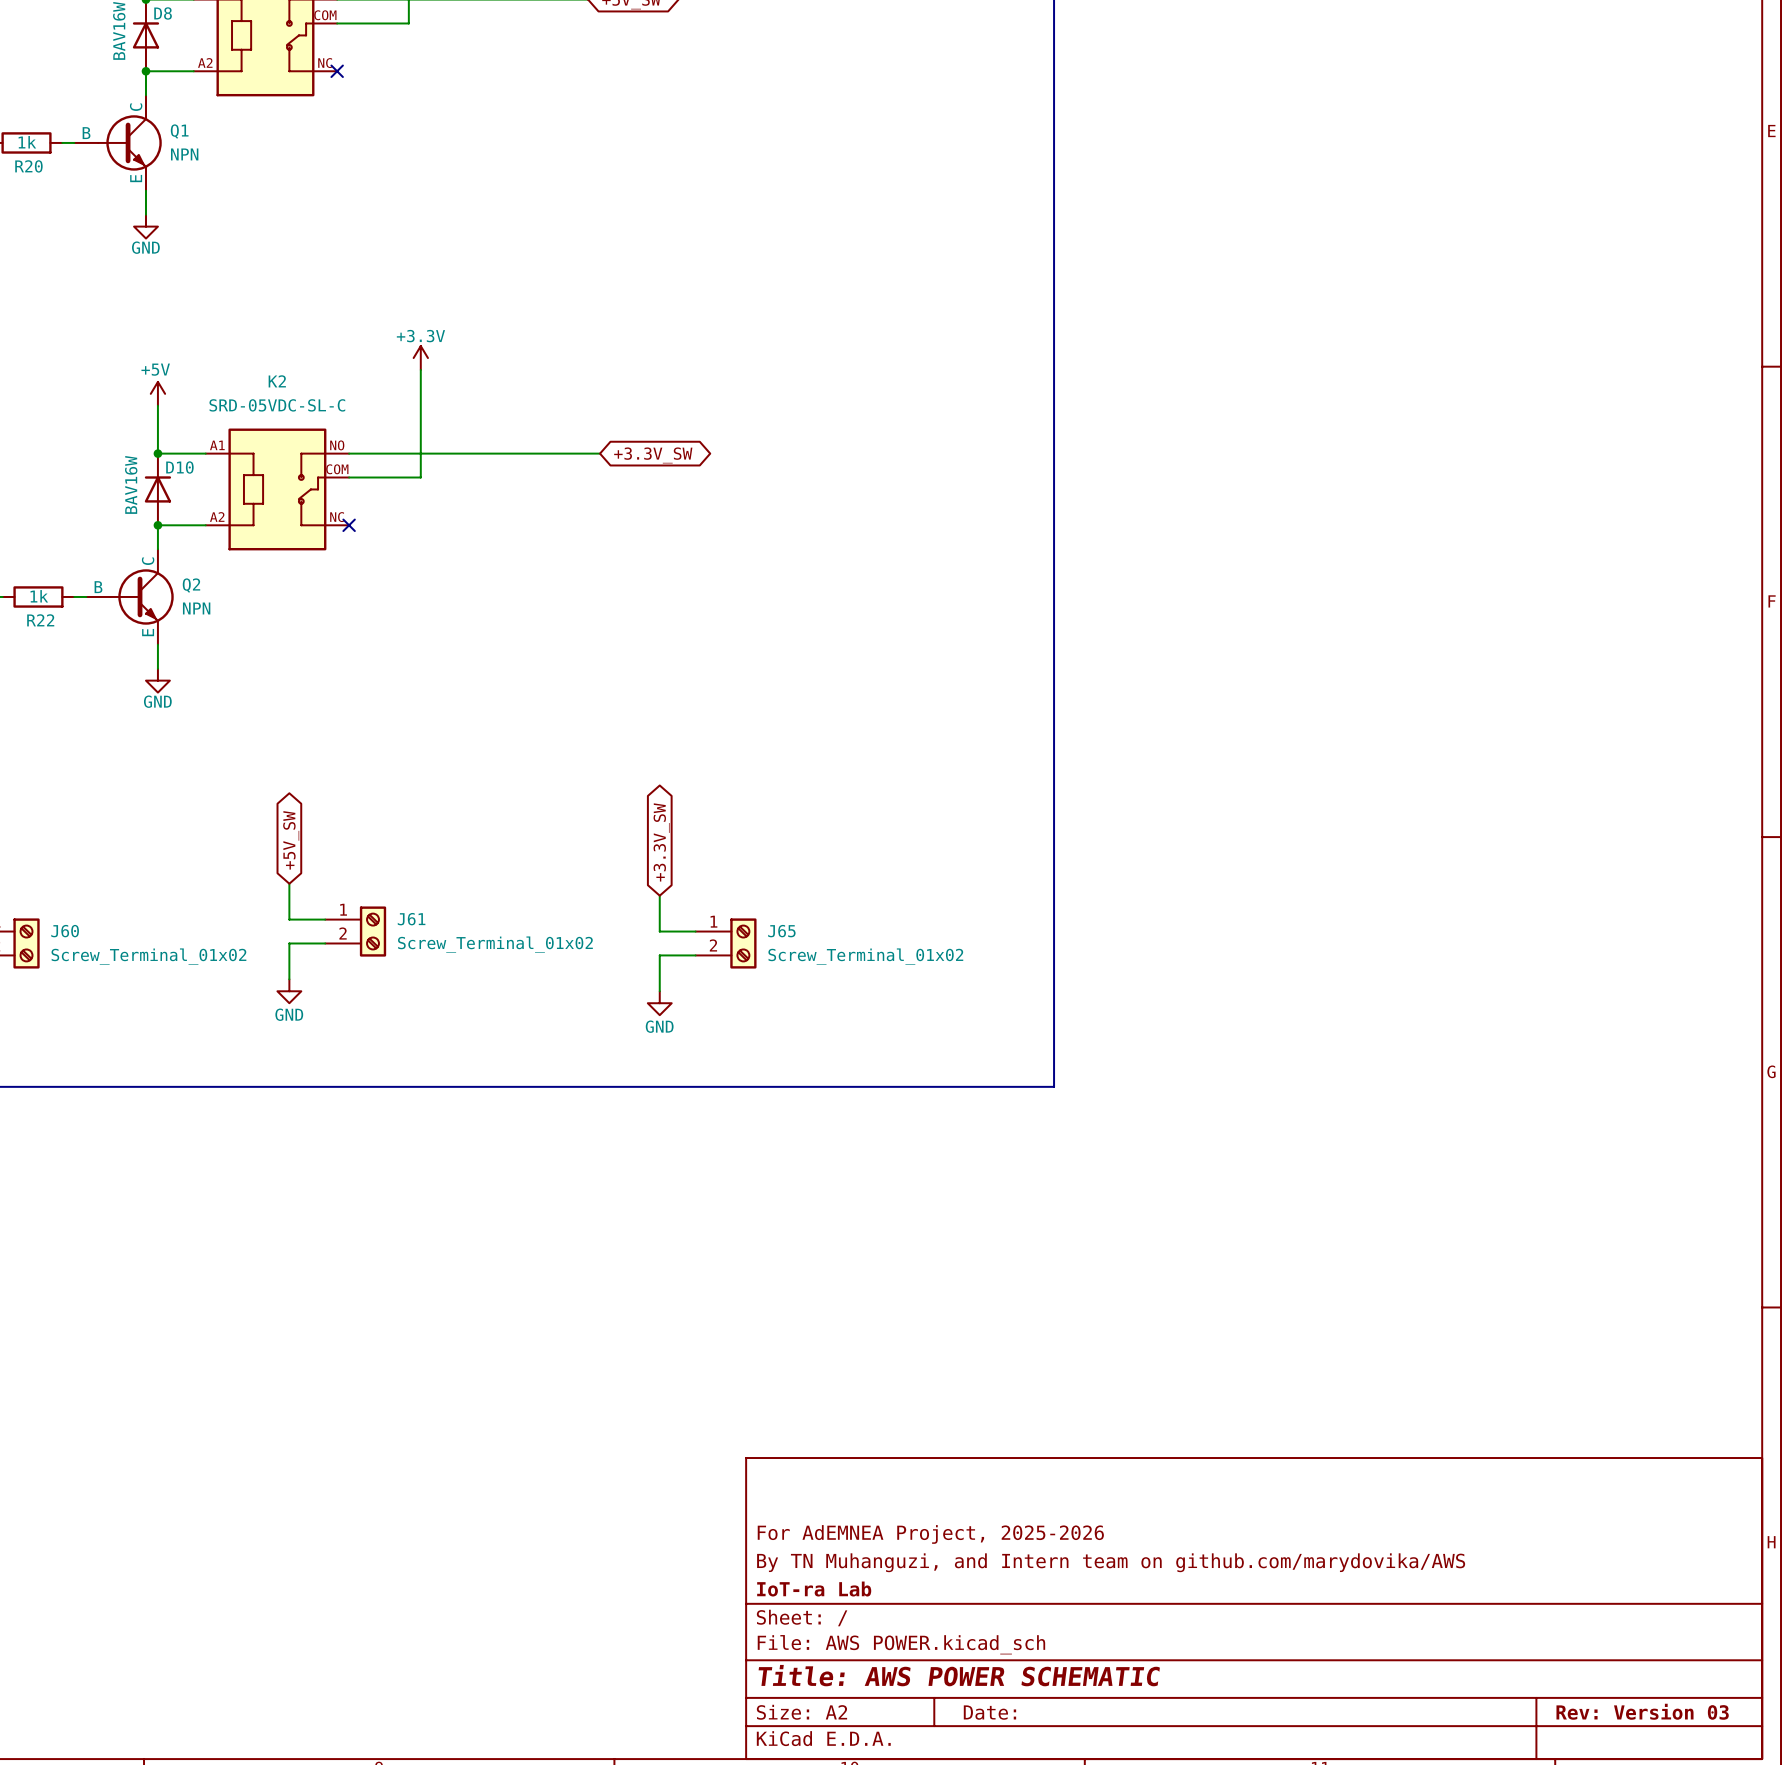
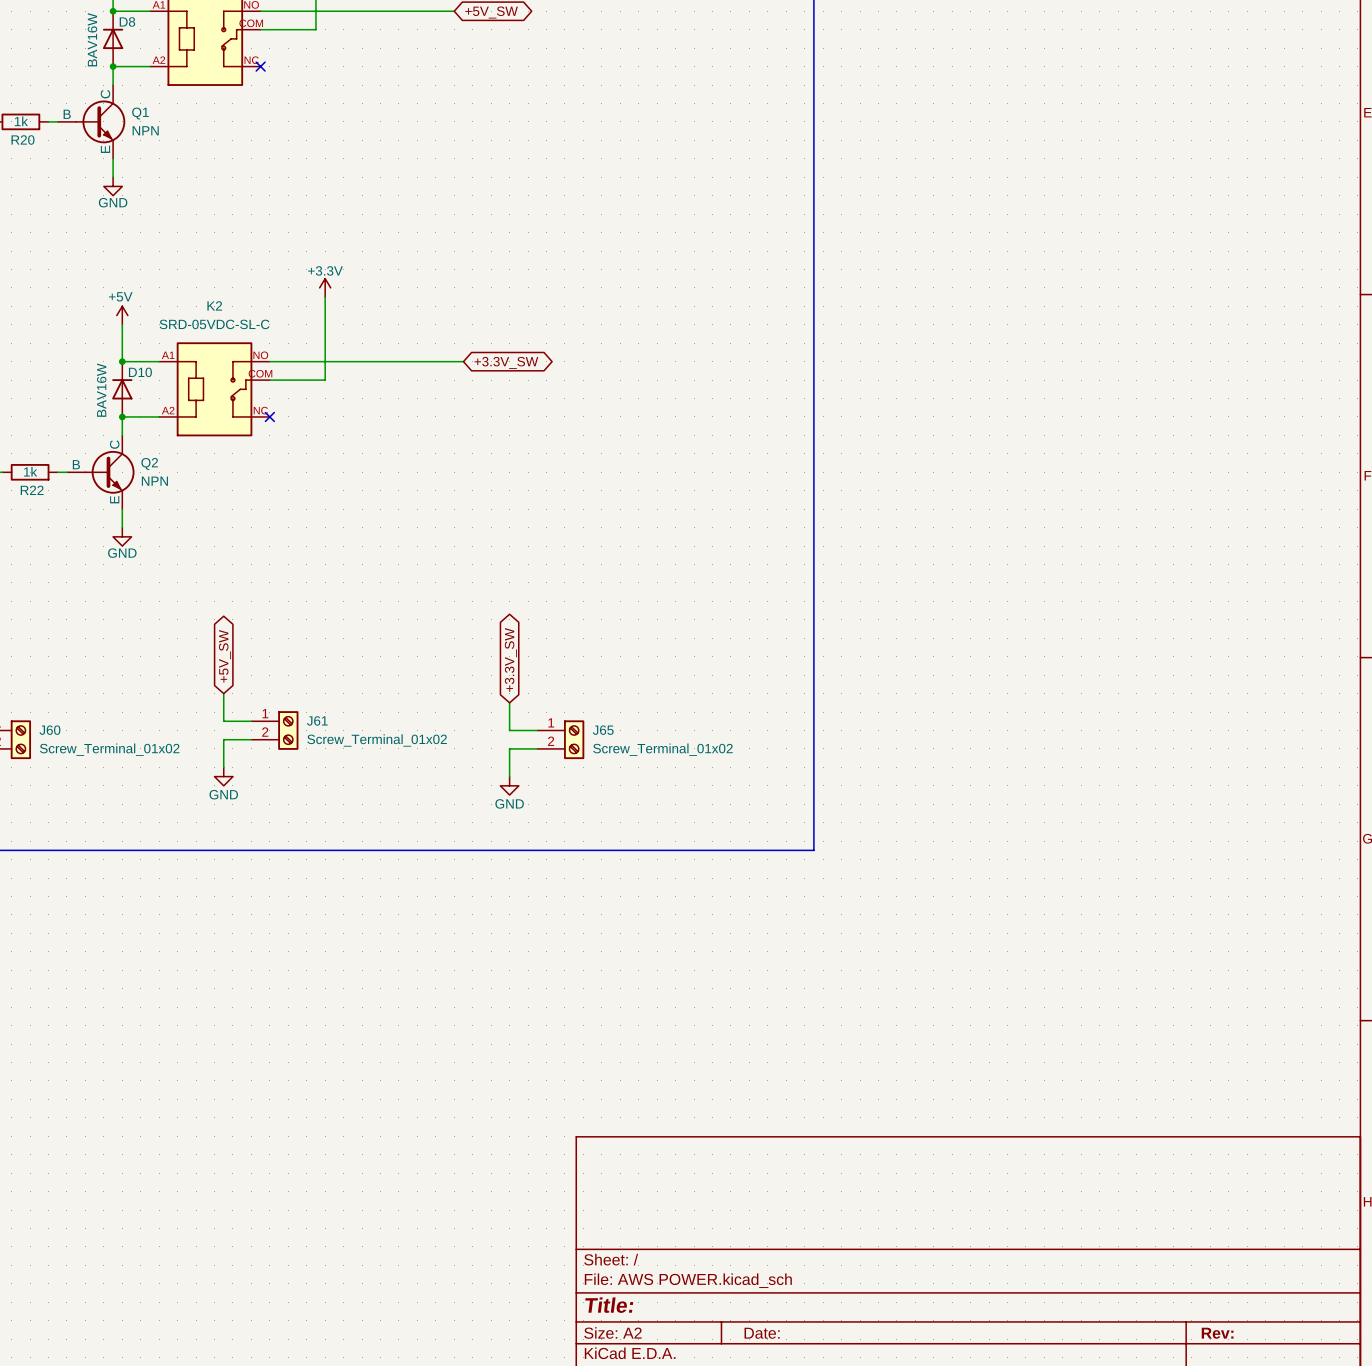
title block: For AdEMNEA Project, 2025-2026 (930, 1534) -> none
title block: By TN Muhanguzi, and Intern team on github.com/marydovika/AWS (1111, 1562) -> none
title block: IoT-ra Lab (814, 1589) -> none
title block: Title: AWS POWER SCHEMATIC (959, 1675) -> Title: (609, 1305)
title block: Rev: Version 03 (1642, 1711) -> Rev: (1217, 1333)

